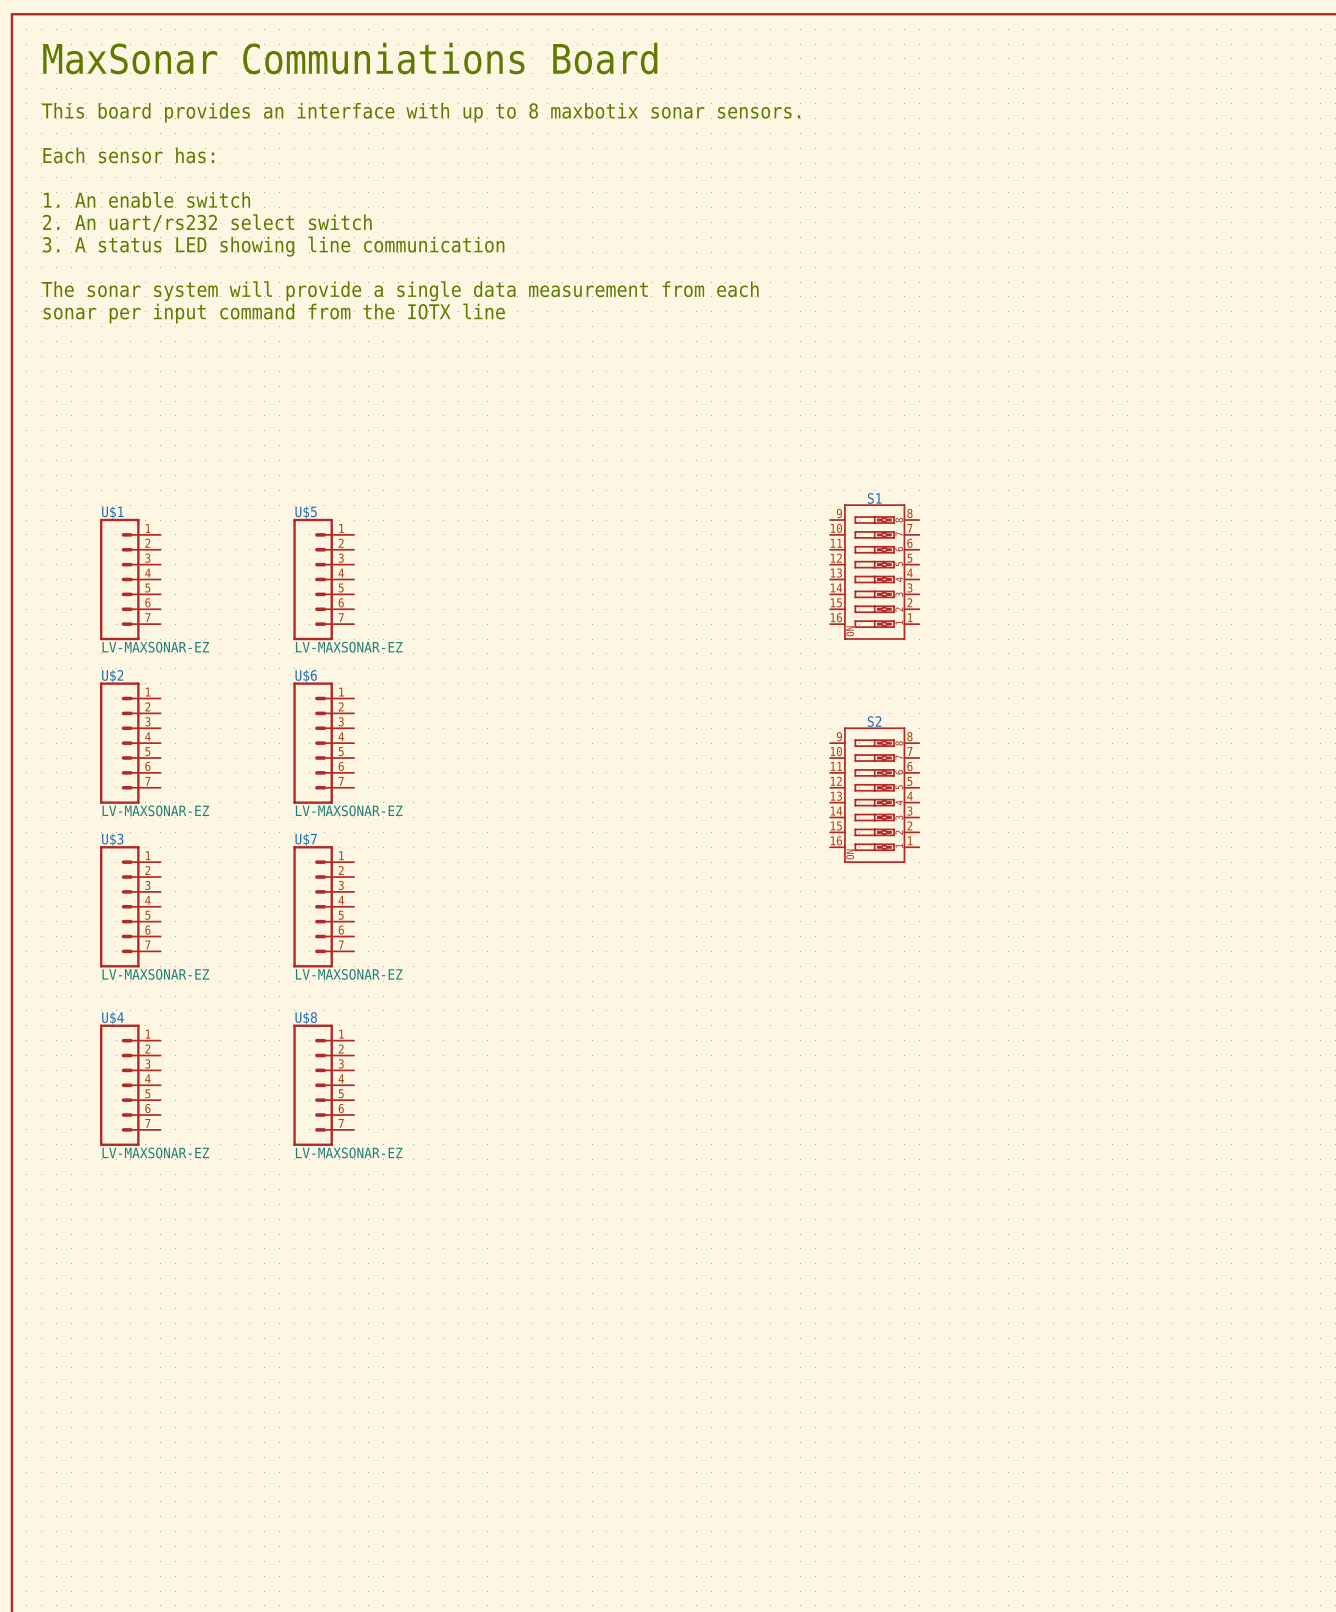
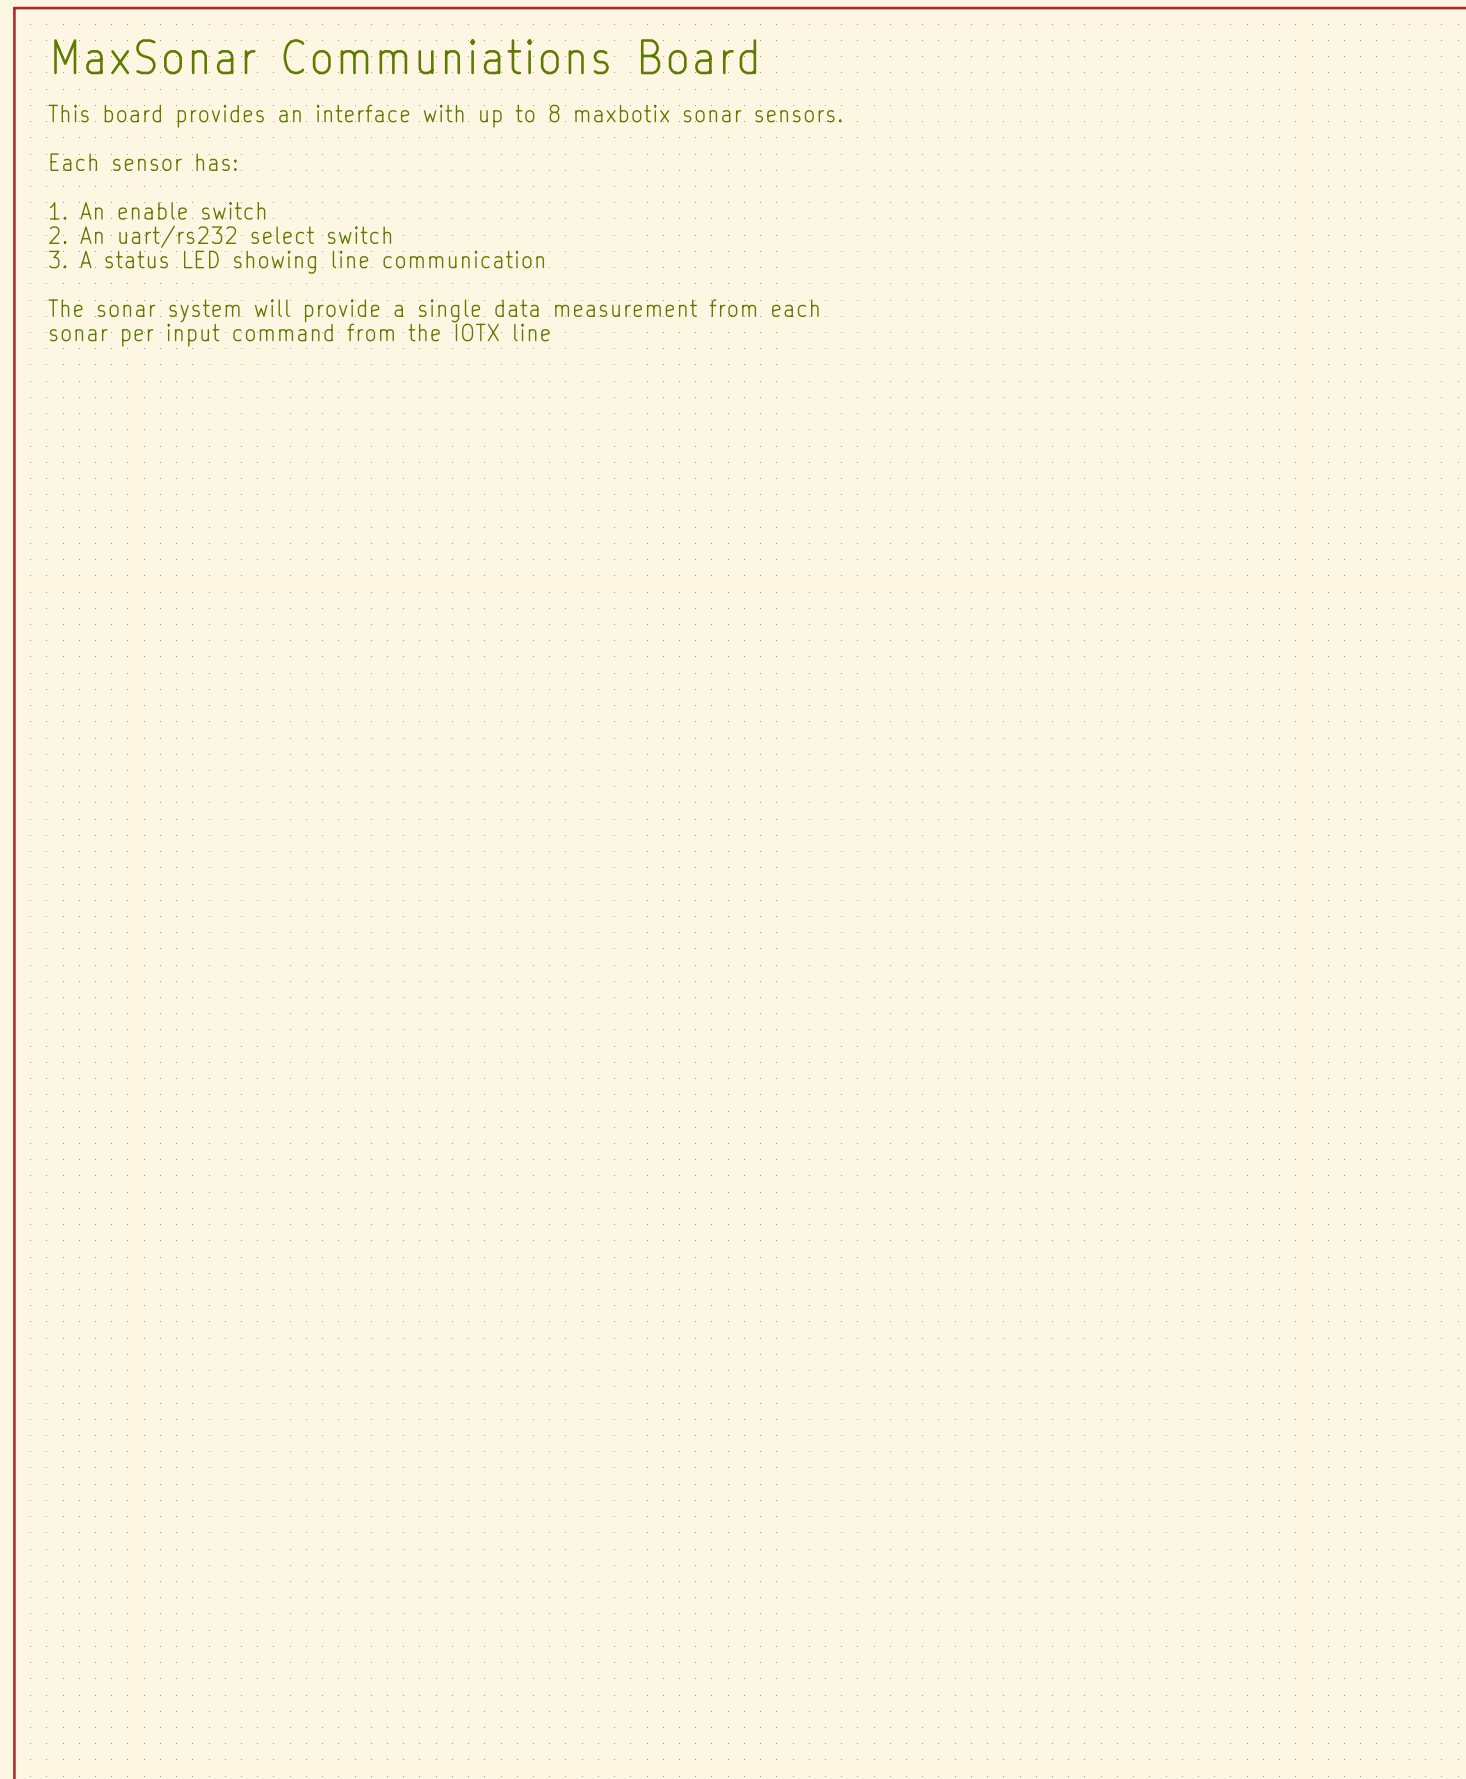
S1: (874, 572) -> none
U$1: LV-MAXSONAR-EZ (130, 579) -> none
U$5: LV-MAXSONAR-EZ (323, 579) -> none
U$2: LV-MAXSONAR-EZ (130, 743) -> none
U$6: LV-MAXSONAR-EZ (323, 743) -> none
S2: (874, 795) -> none
U$3: LV-MAXSONAR-EZ (130, 906) -> none
U$7: LV-MAXSONAR-EZ (323, 906) -> none
U$4: LV-MAXSONAR-EZ (130, 1085) -> none
U$8: LV-MAXSONAR-EZ (323, 1085) -> none

